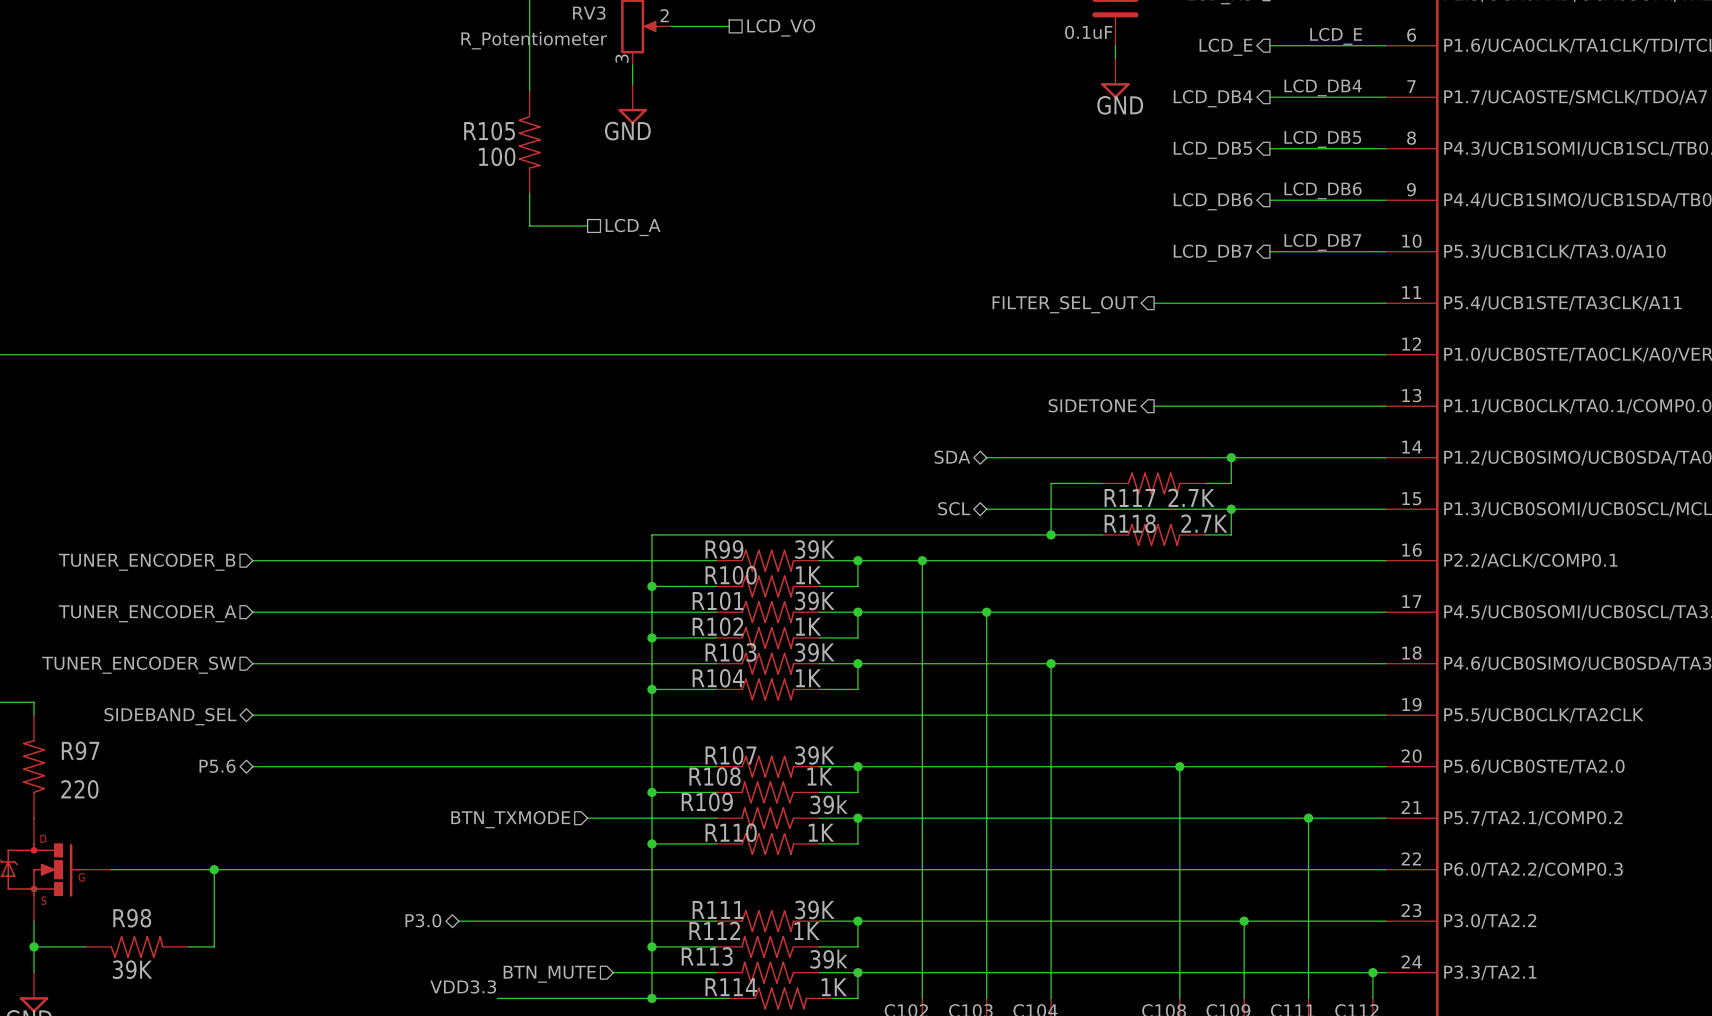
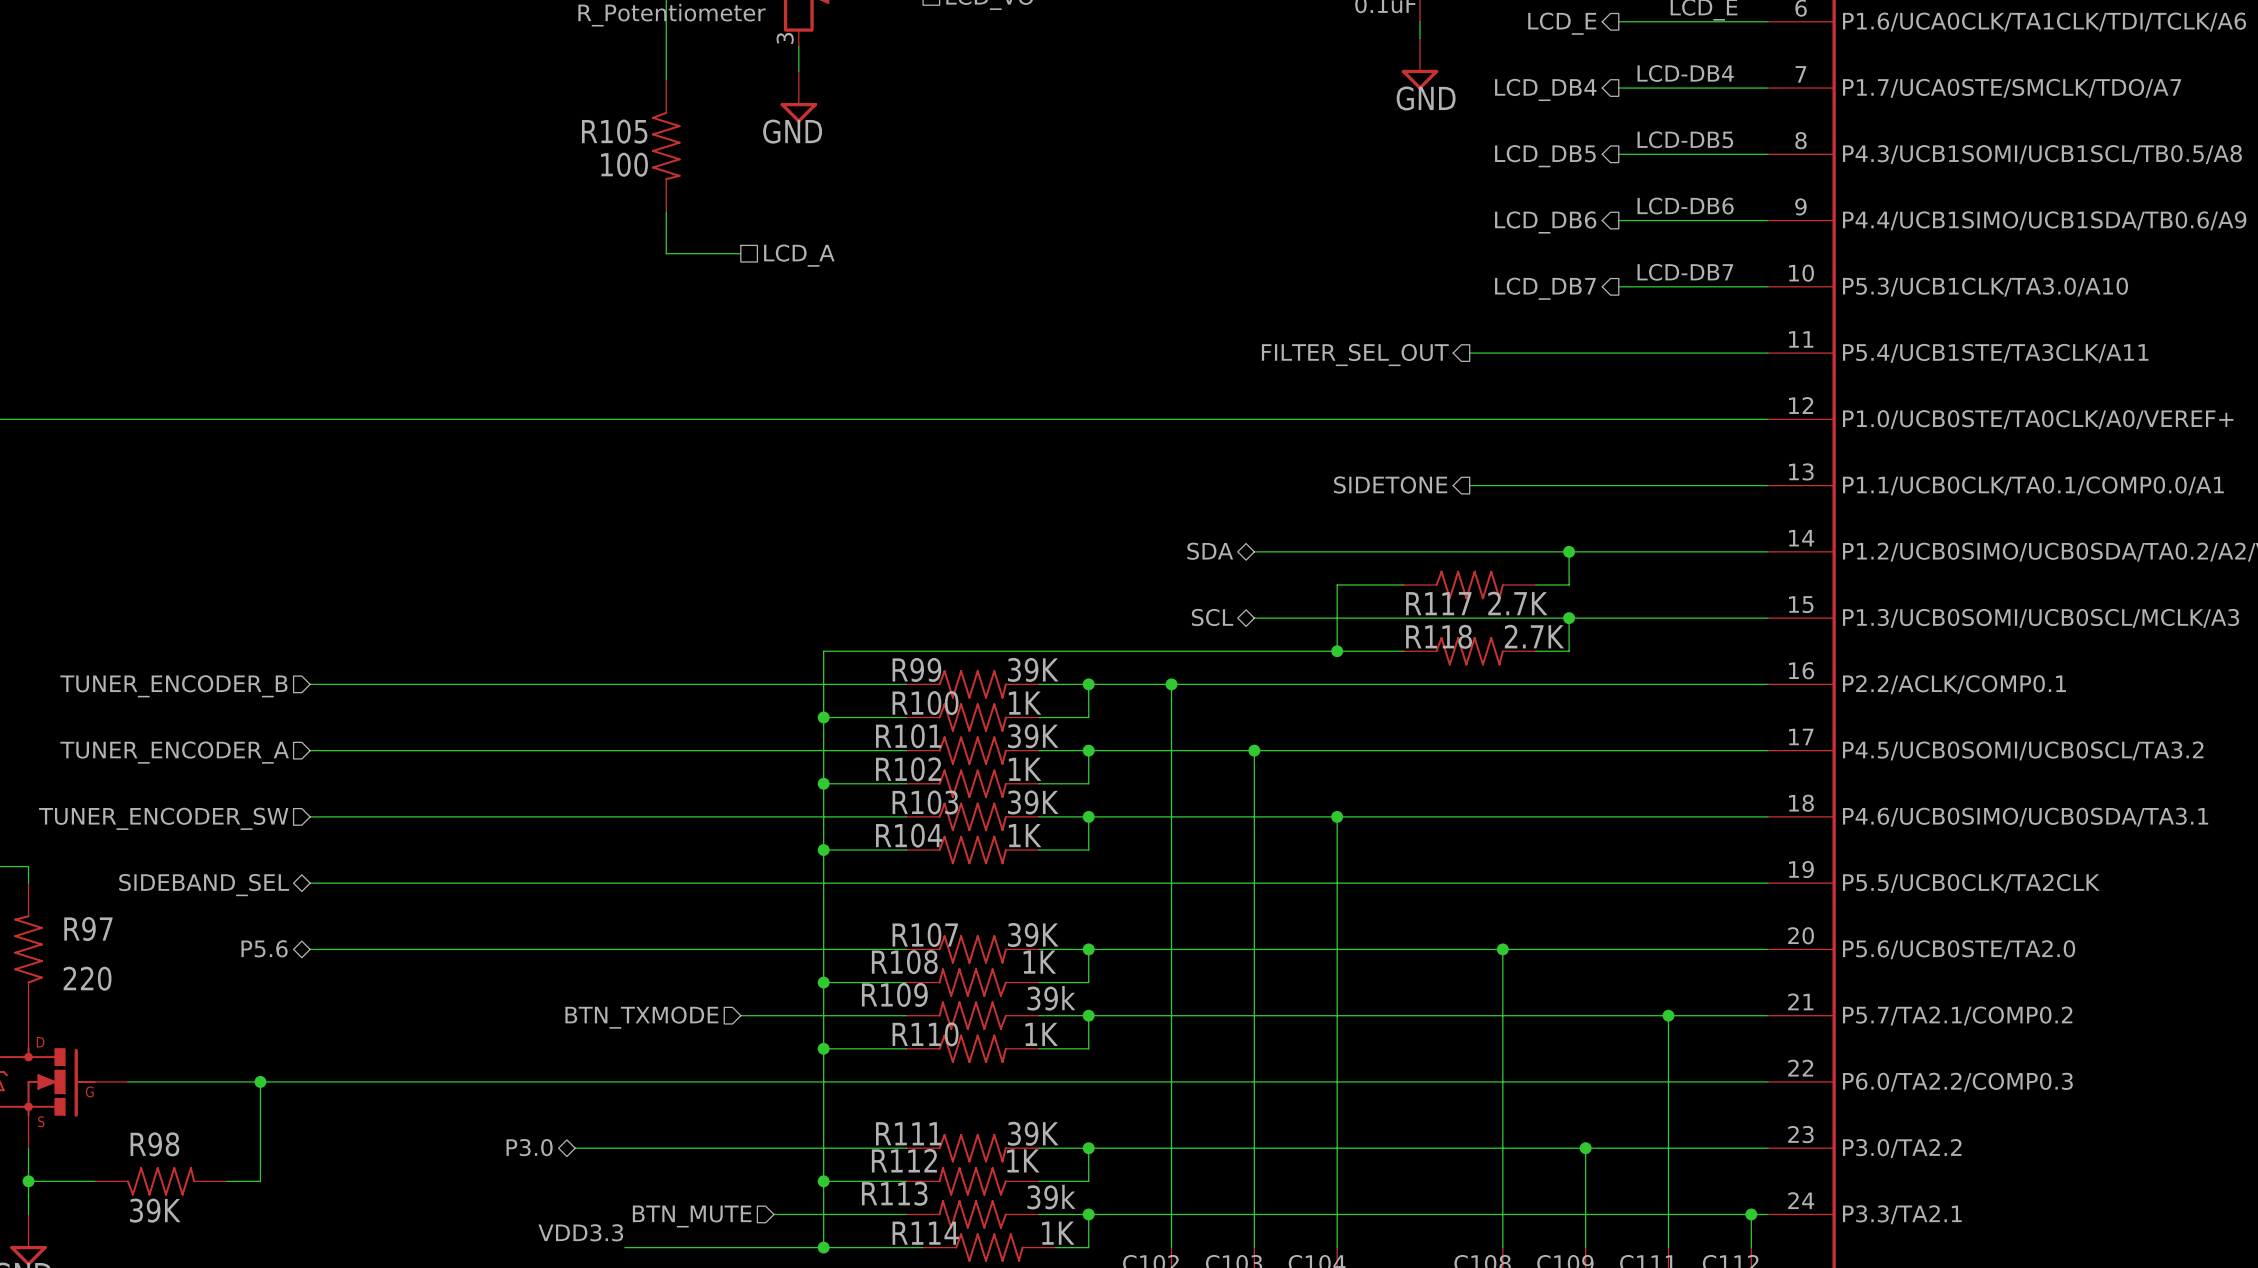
label: LCD_DB4 (1323, 87) -> LCD-DB4 (1685, 73)
label: LCD_DB5 (1322, 139) -> LCD-DB5 (1685, 139)
label: LCD_DB6 (1323, 190) -> LCD-DB6 (1685, 206)
label: LCD_DB7 (1322, 242) -> LCD-DB7 (1685, 272)

